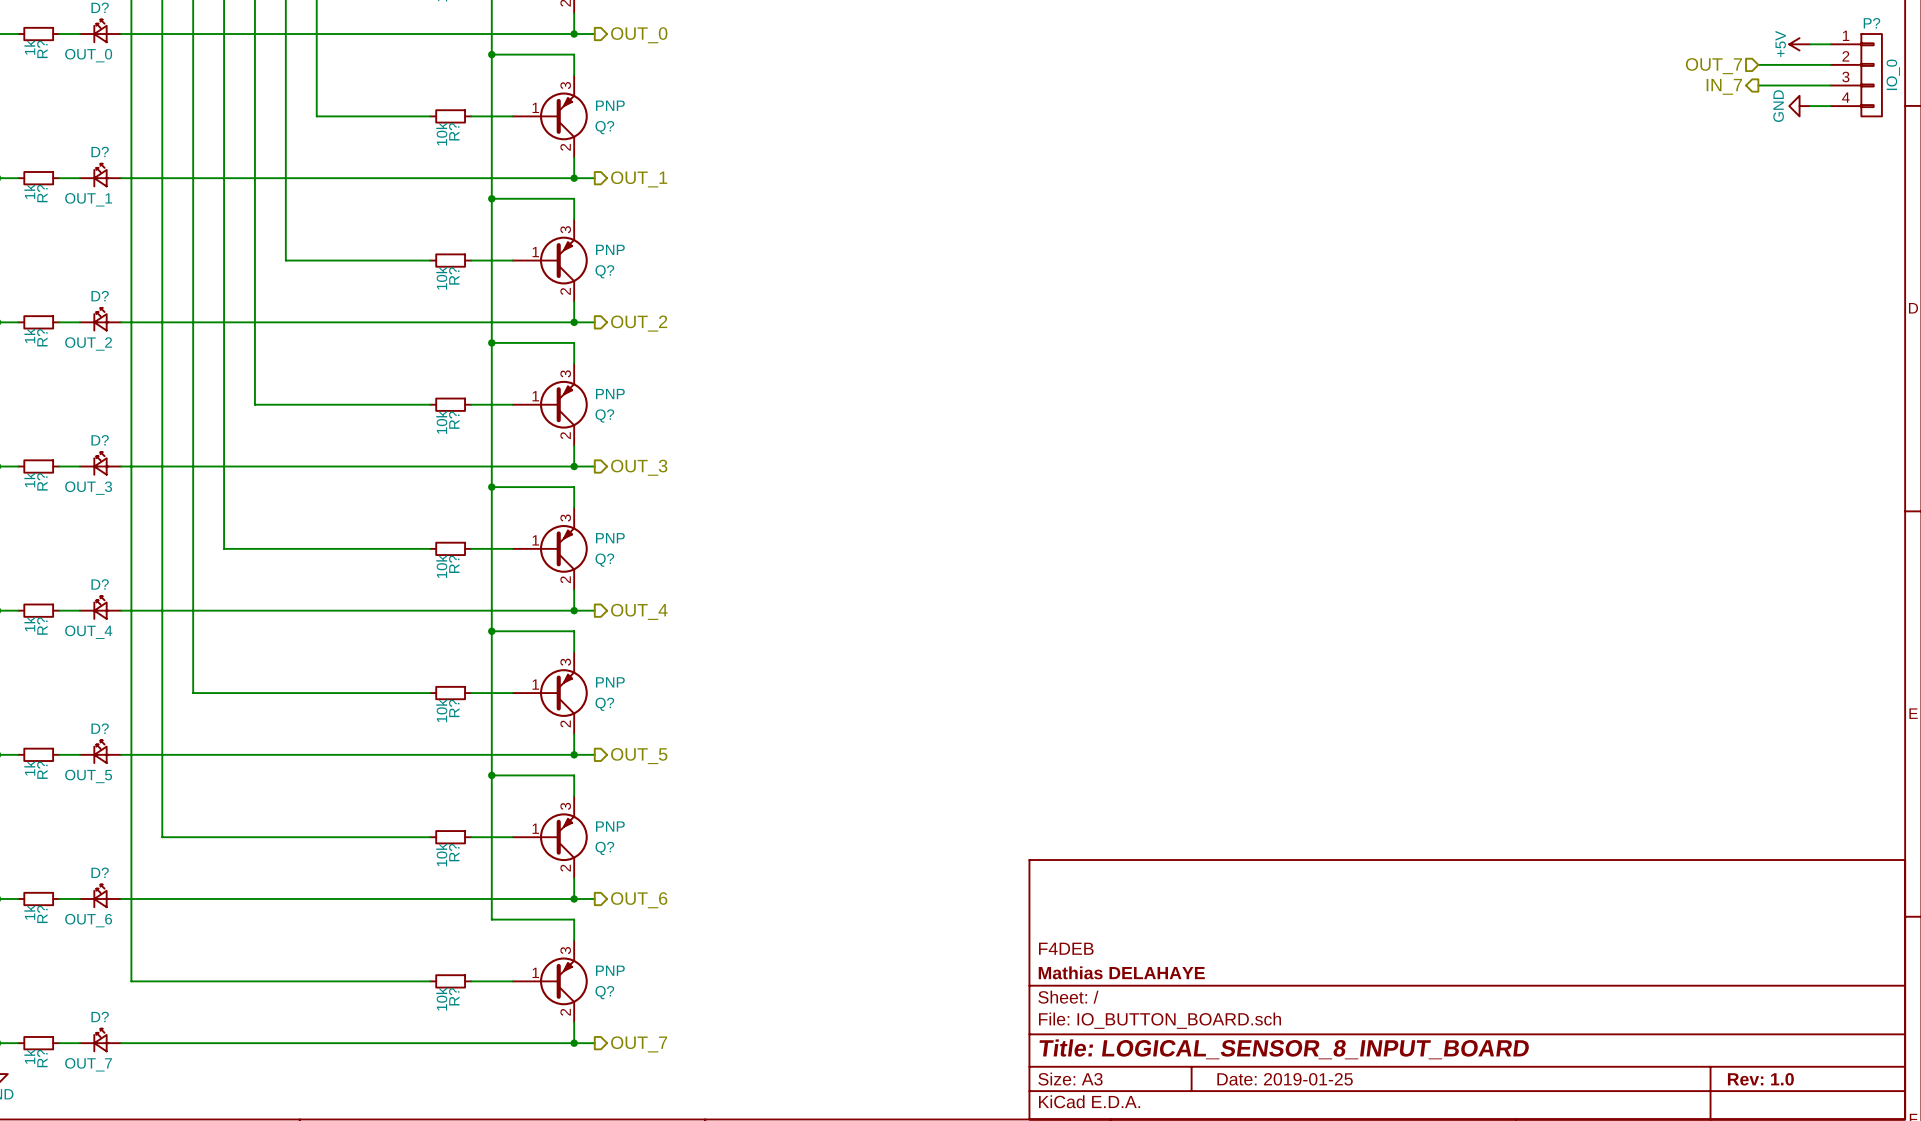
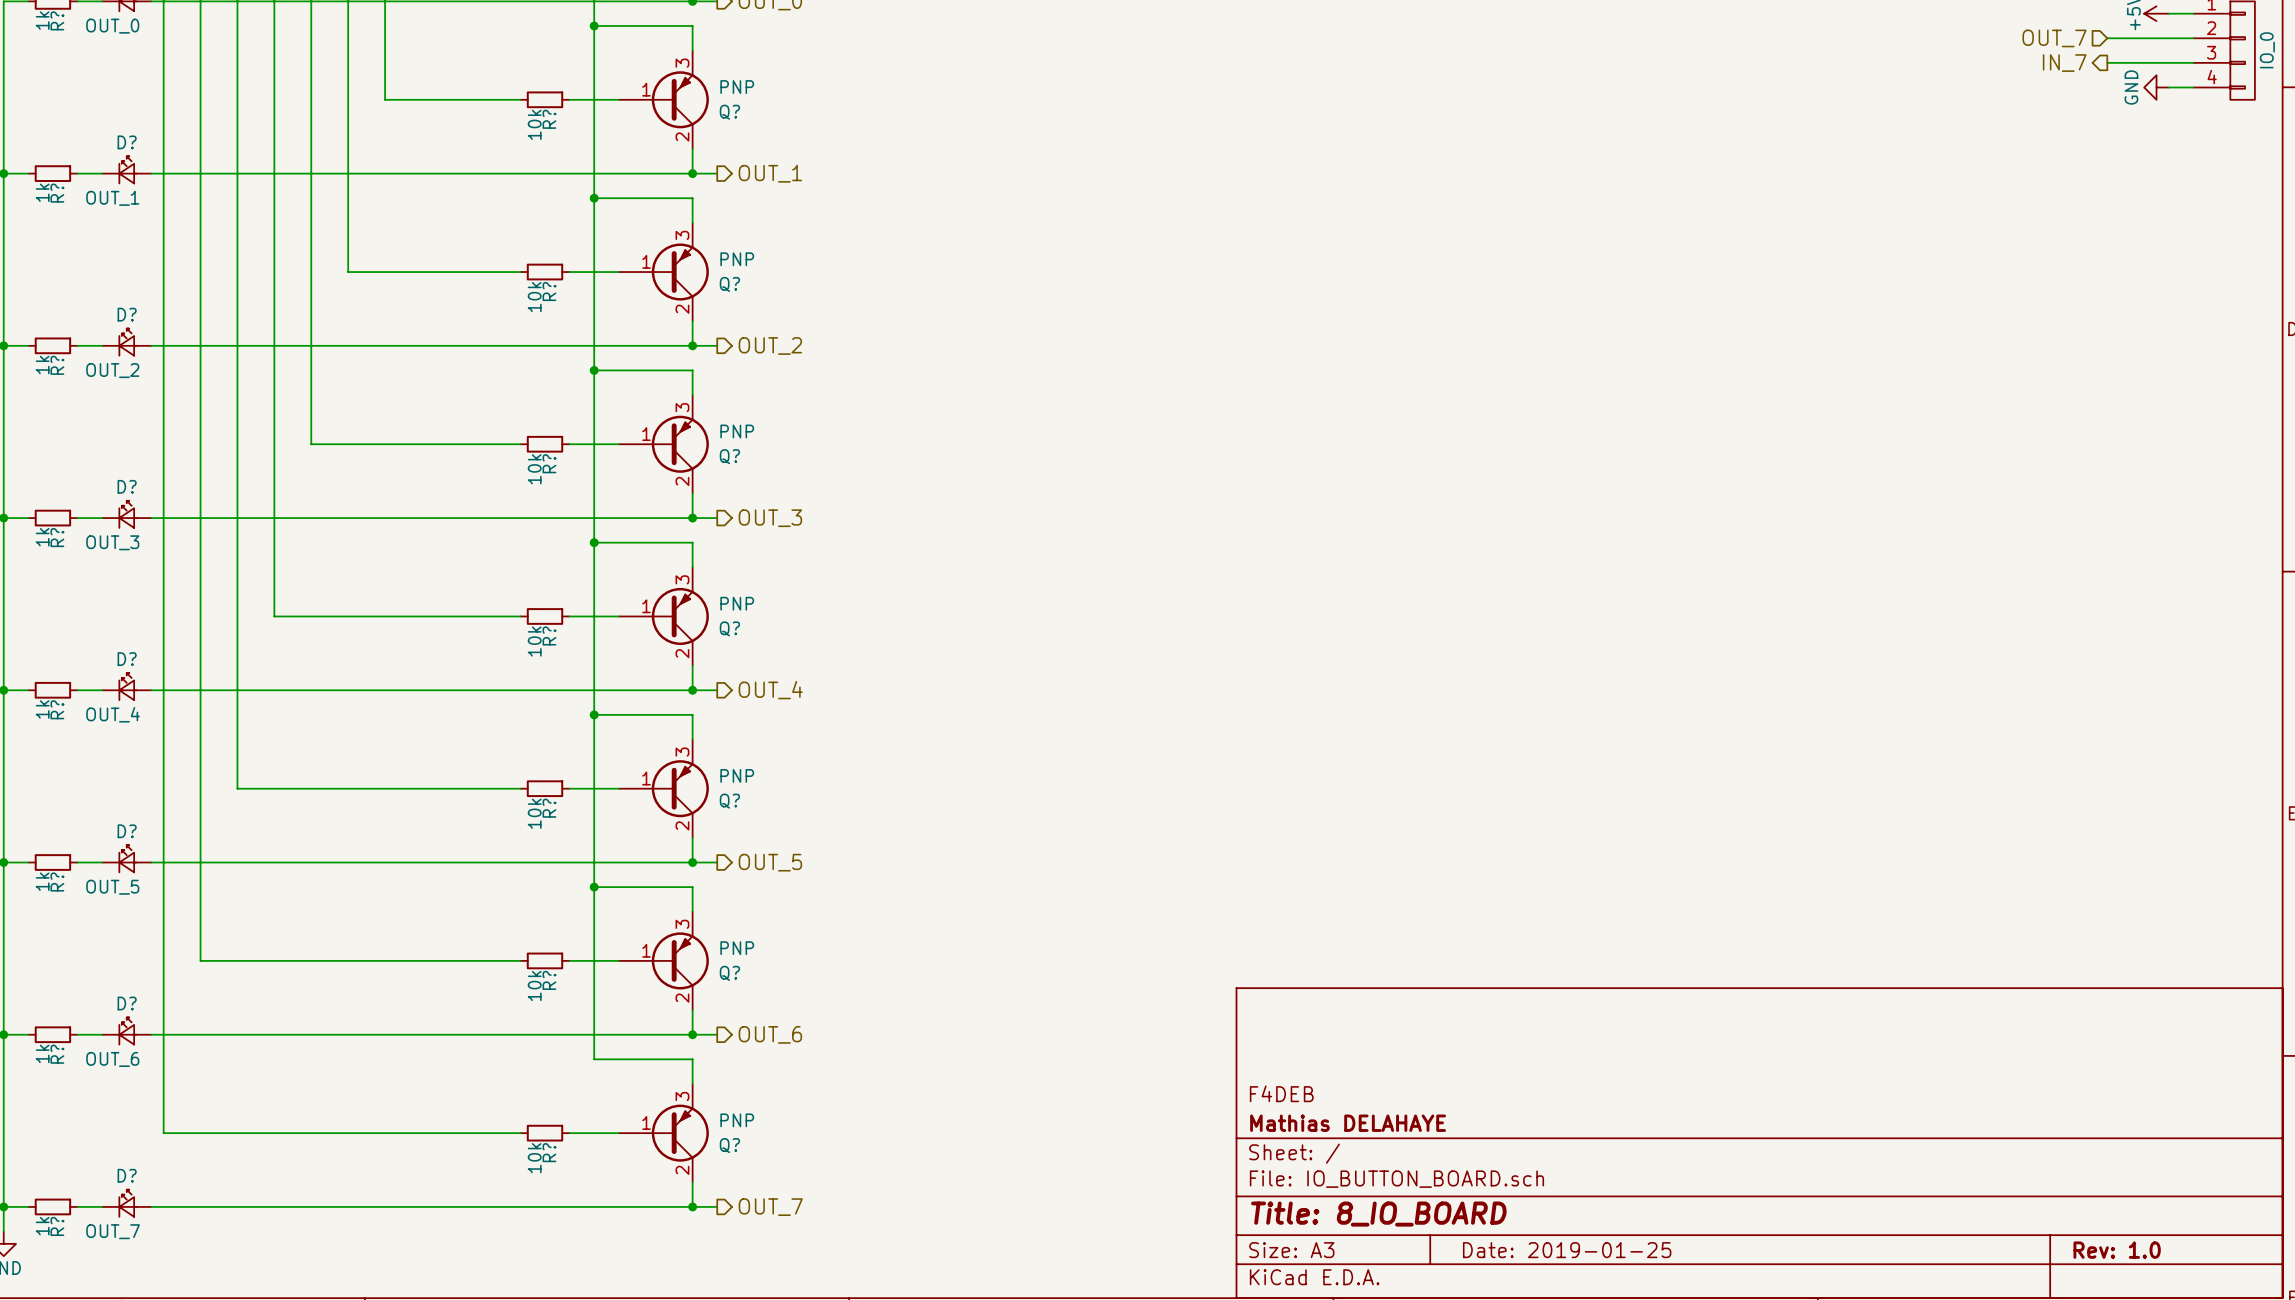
title block: Title: LOGICAL_SENSOR_8_INPUT_BOARD (1284, 1049) -> Title: 8_IO_BOARD (1378, 1214)

